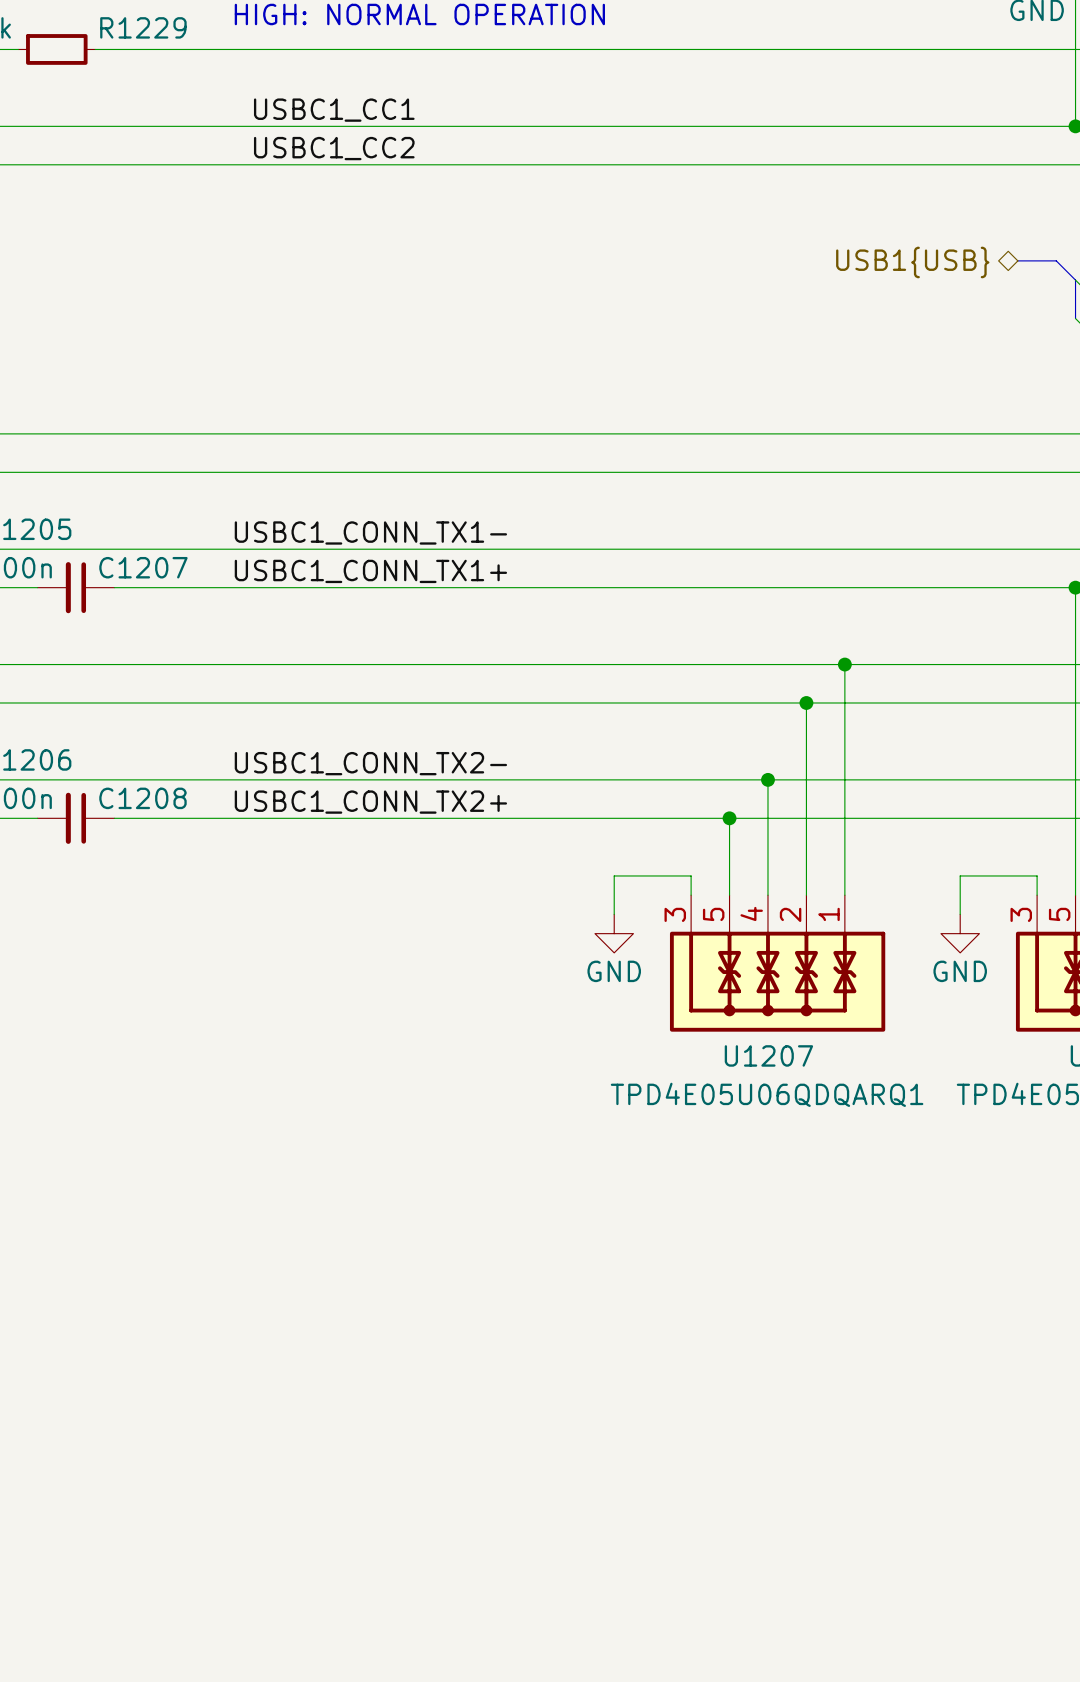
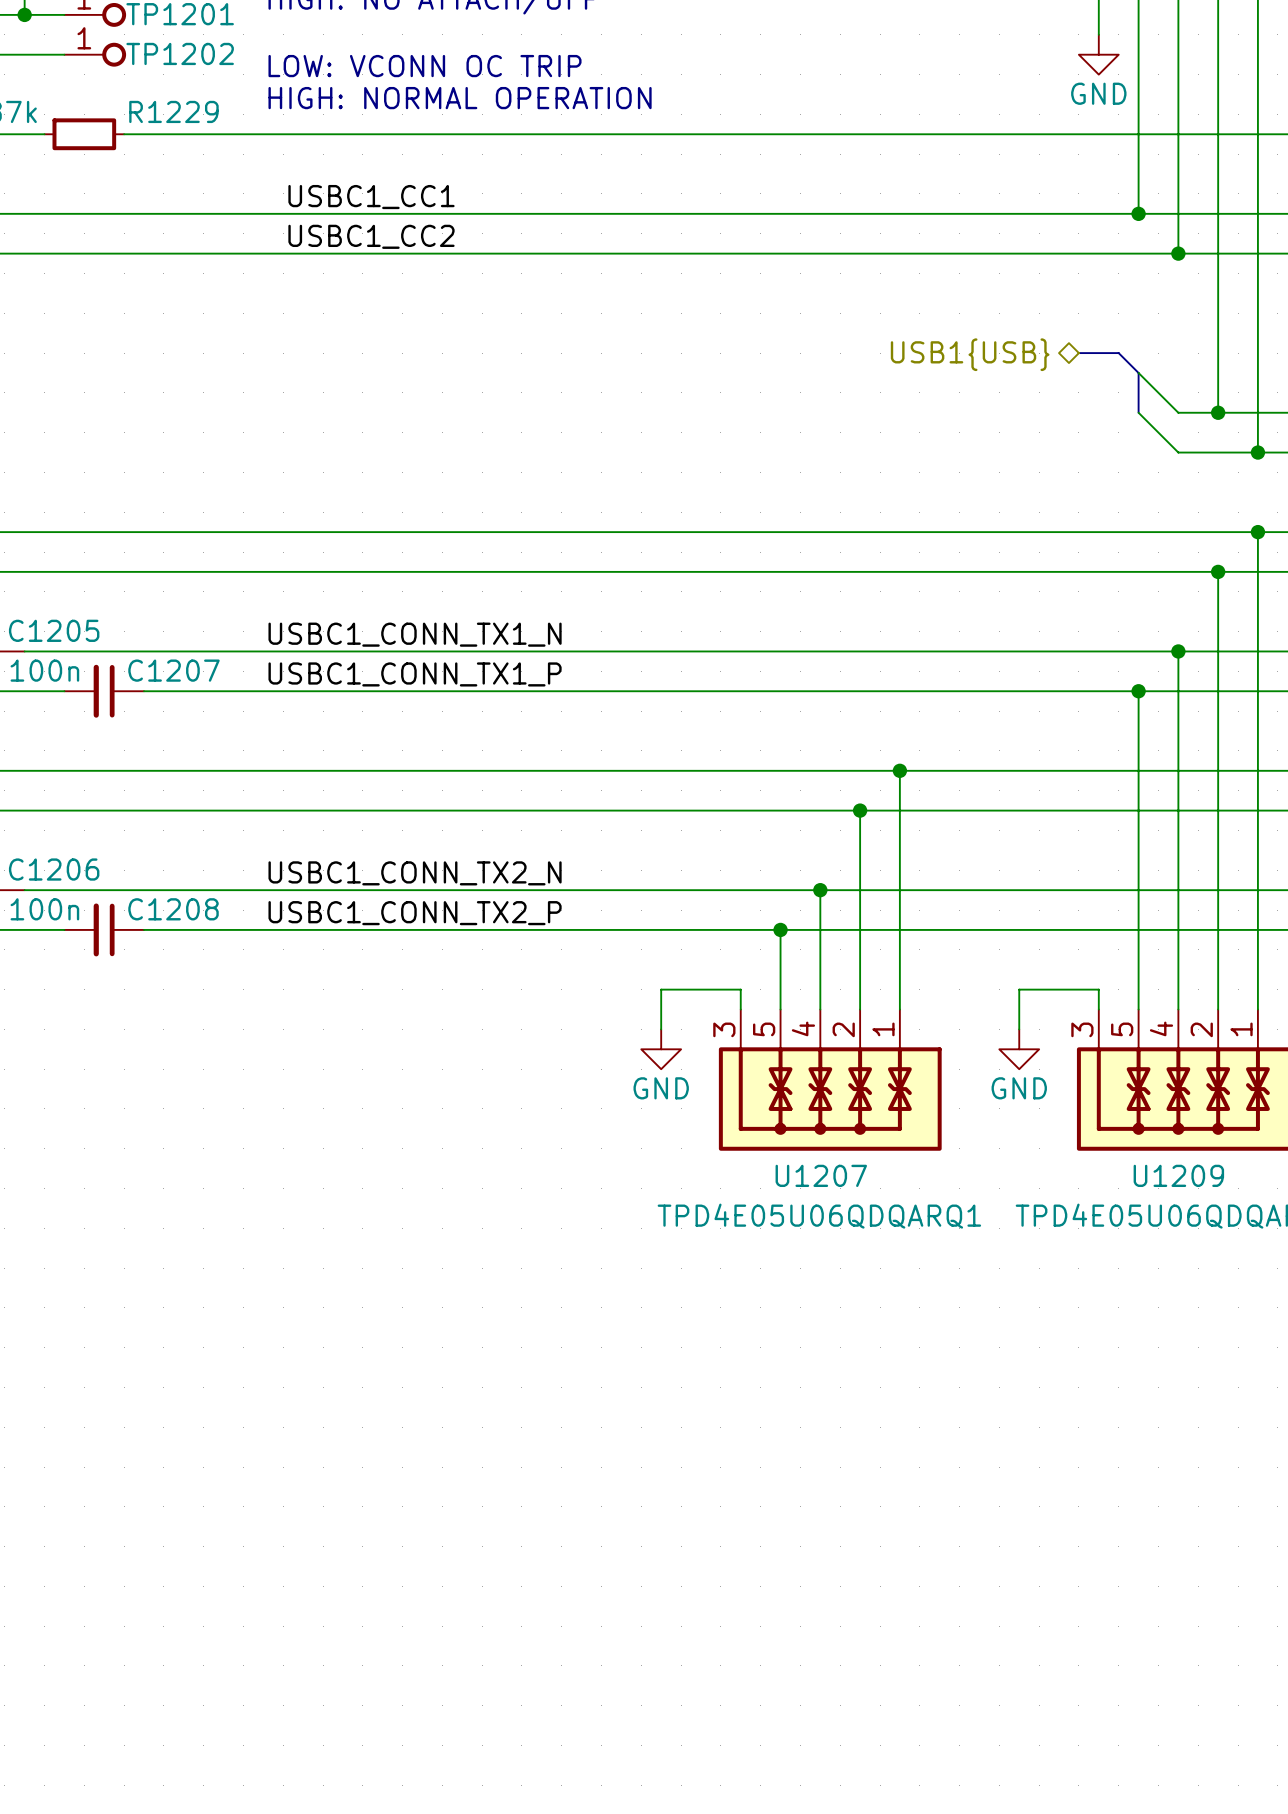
label: USBC1_CONN_TX1- (370, 532) -> USBC1_CONN_TX1_N (415, 634)
label: USBC1_CONN_TX1+ (370, 571) -> USBC1_CONN_TX1_P (415, 674)
label: USBC1_CONN_TX2- (370, 763) -> USBC1_CONN_TX2_N (415, 873)
label: USBC1_CONN_TX2+ (370, 802) -> USBC1_CONN_TX2_P (415, 913)

